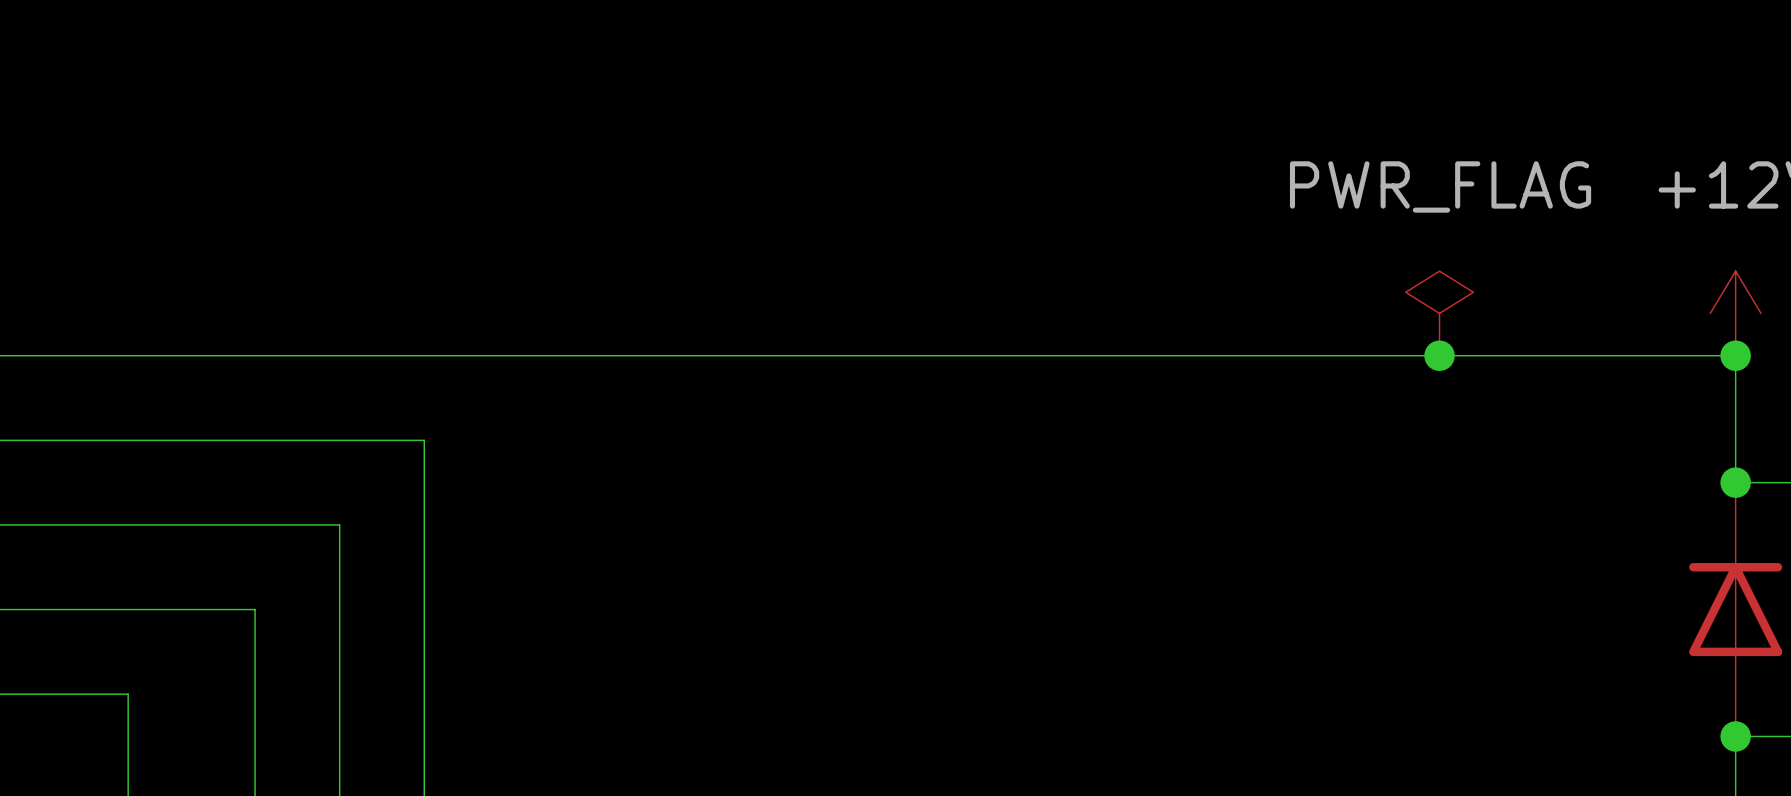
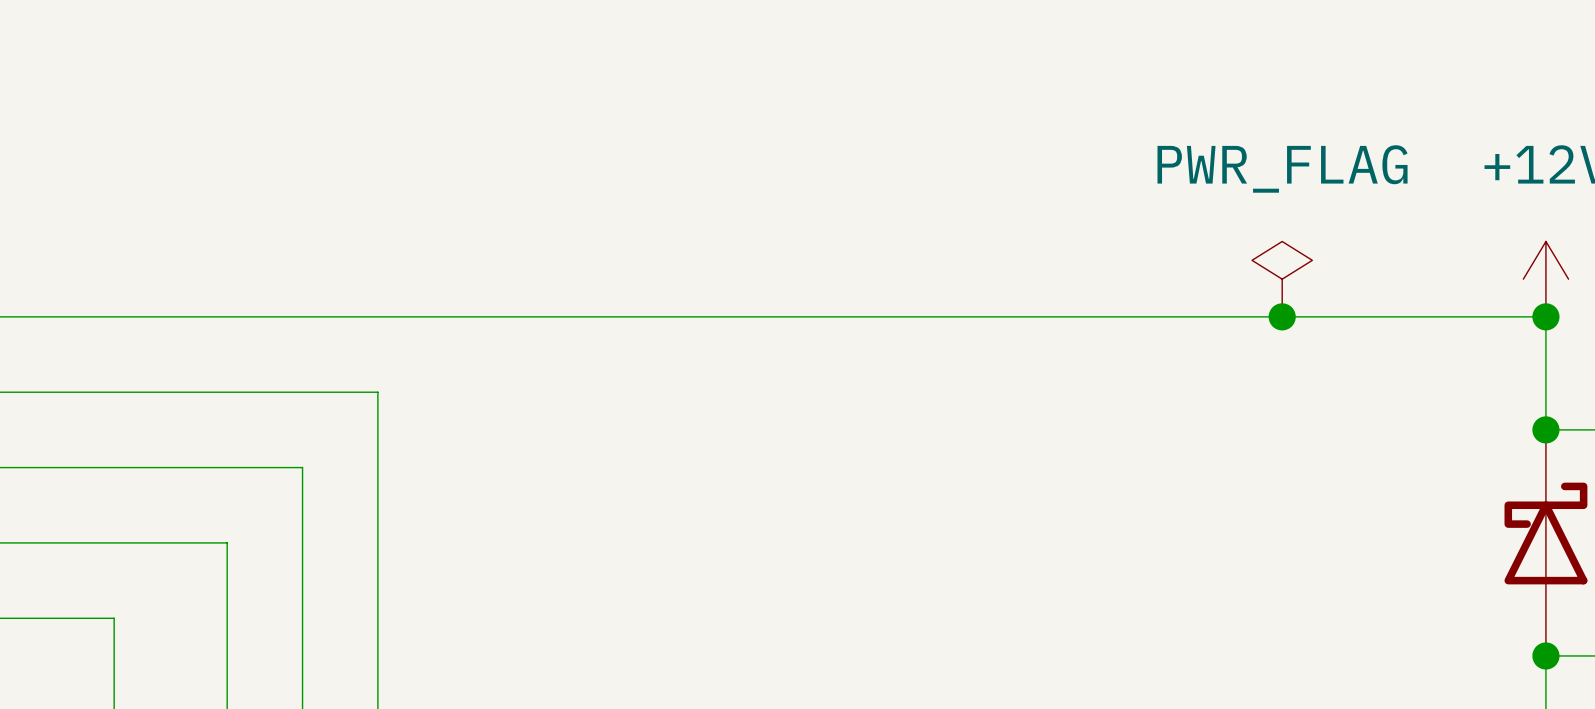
part symbol: [1689, 482, 1783, 737] -> [1504, 429, 1588, 656]

